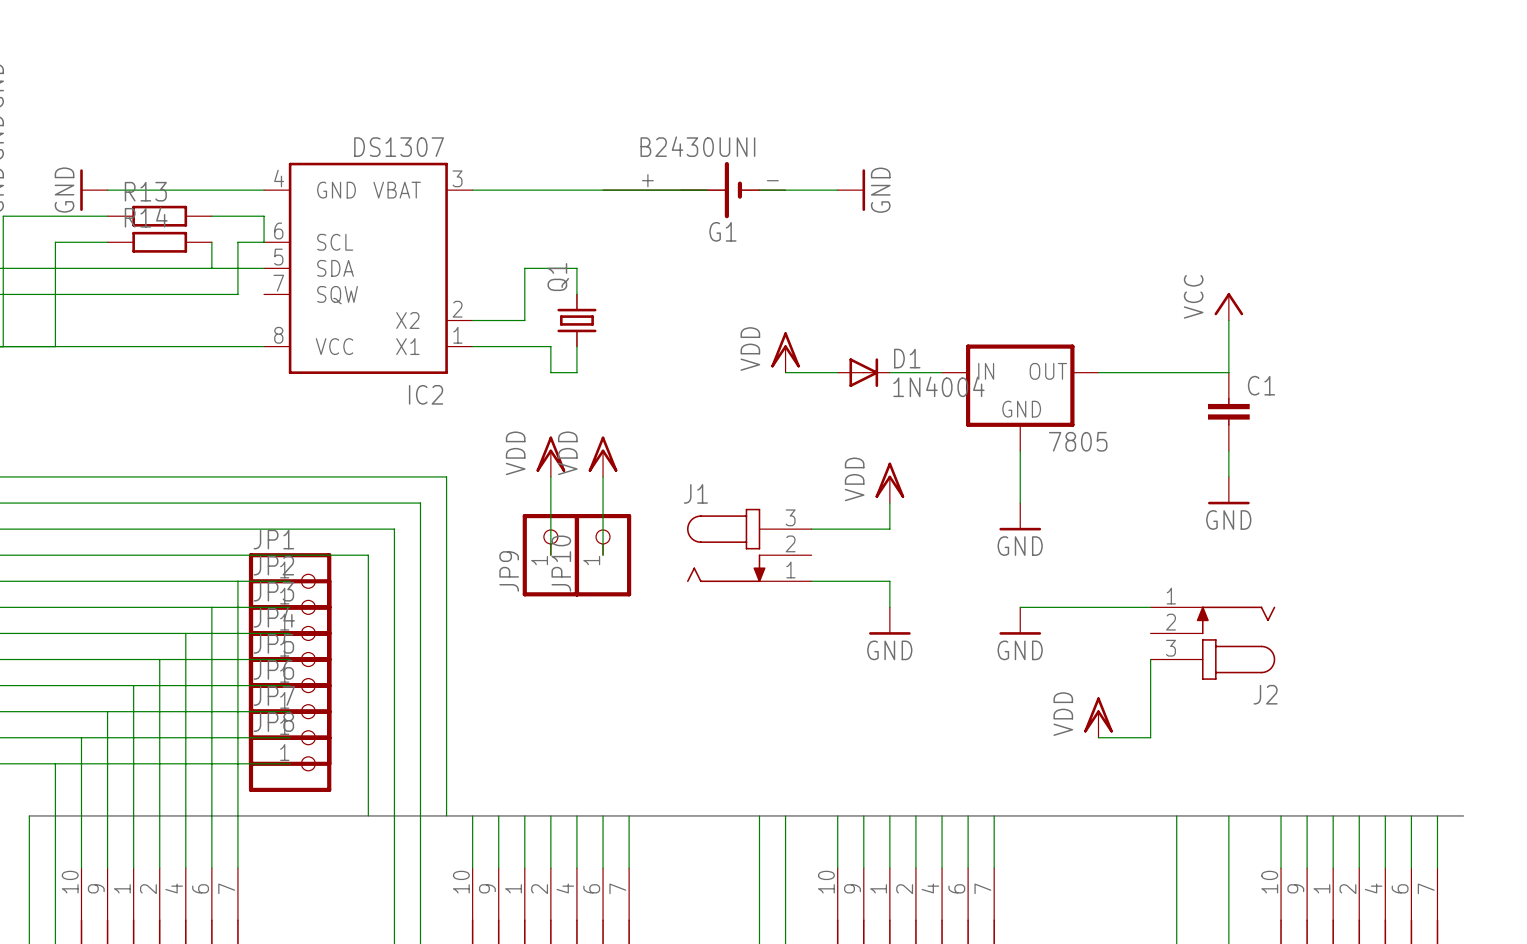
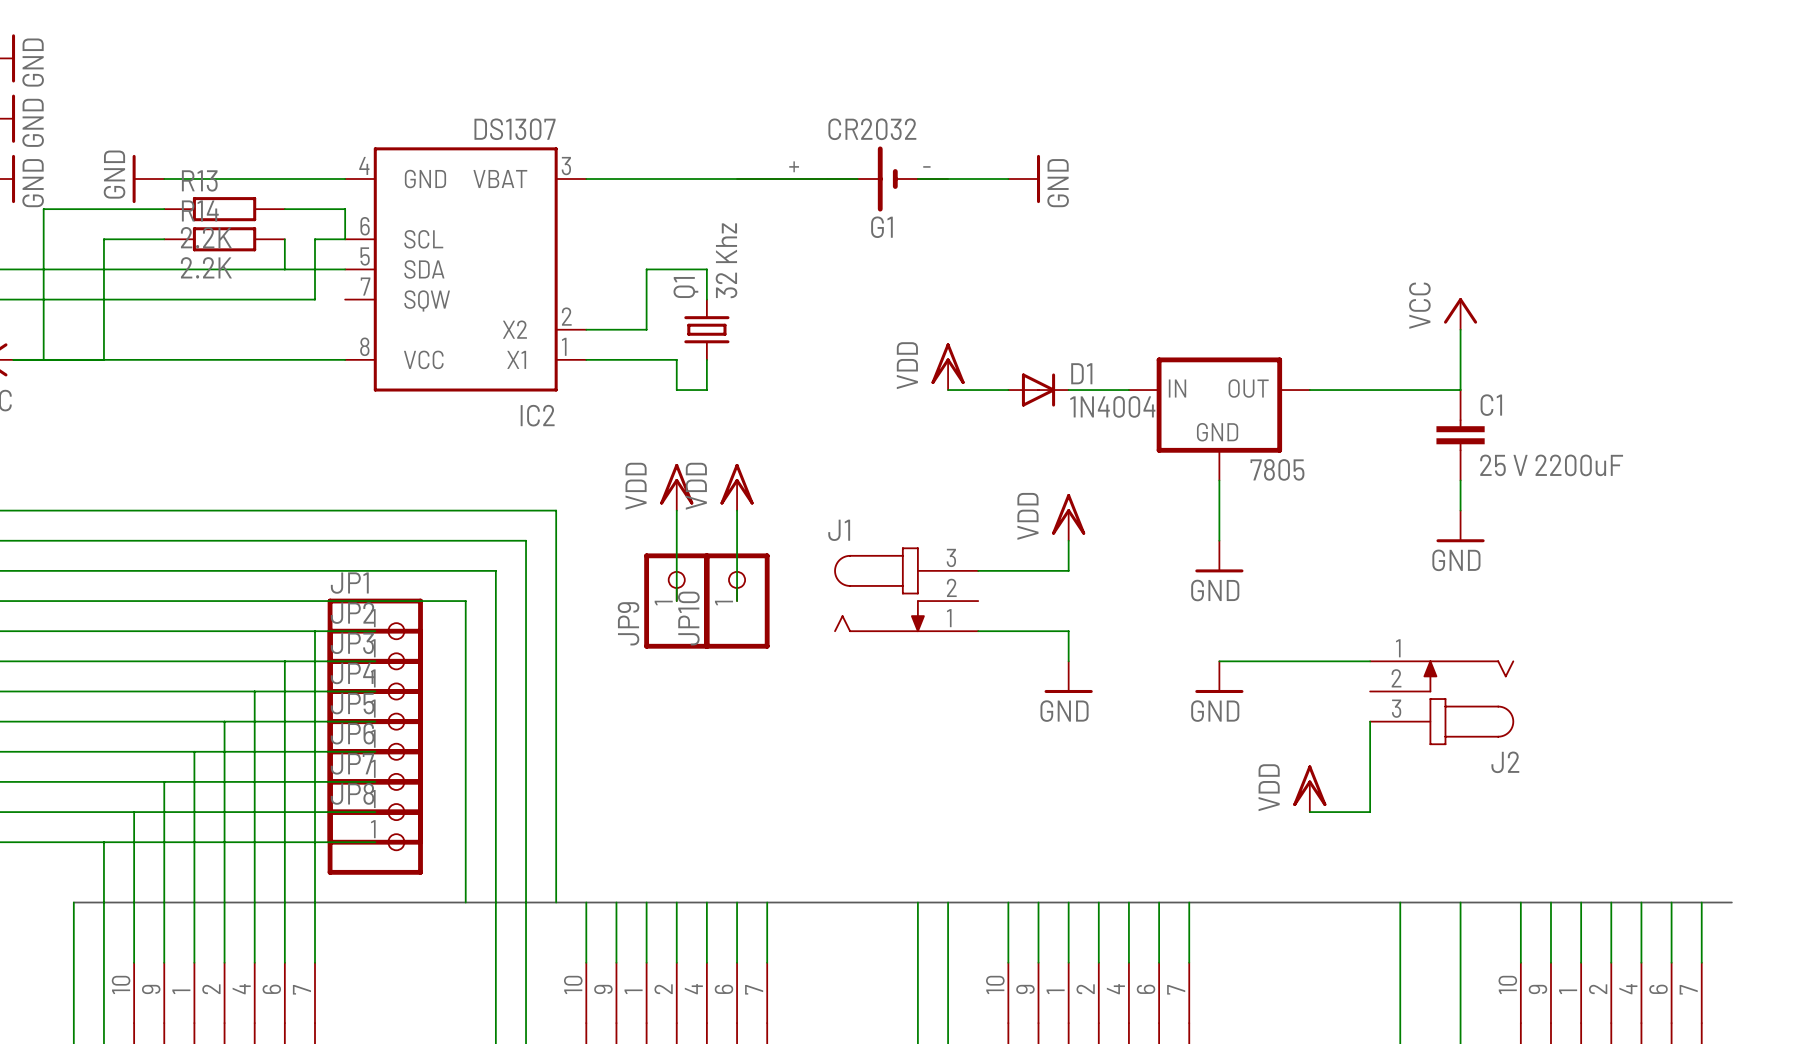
G1 value: B2430UNI (697, 146) -> CR2032 (872, 129)
R13 value: none -> 2.2K (206, 237)
Q1 value: none -> 32 Khz (726, 260)
R14 value: none -> 2.2K (206, 267)
C1 value: none -> 25 V 2200uF (1551, 465)

